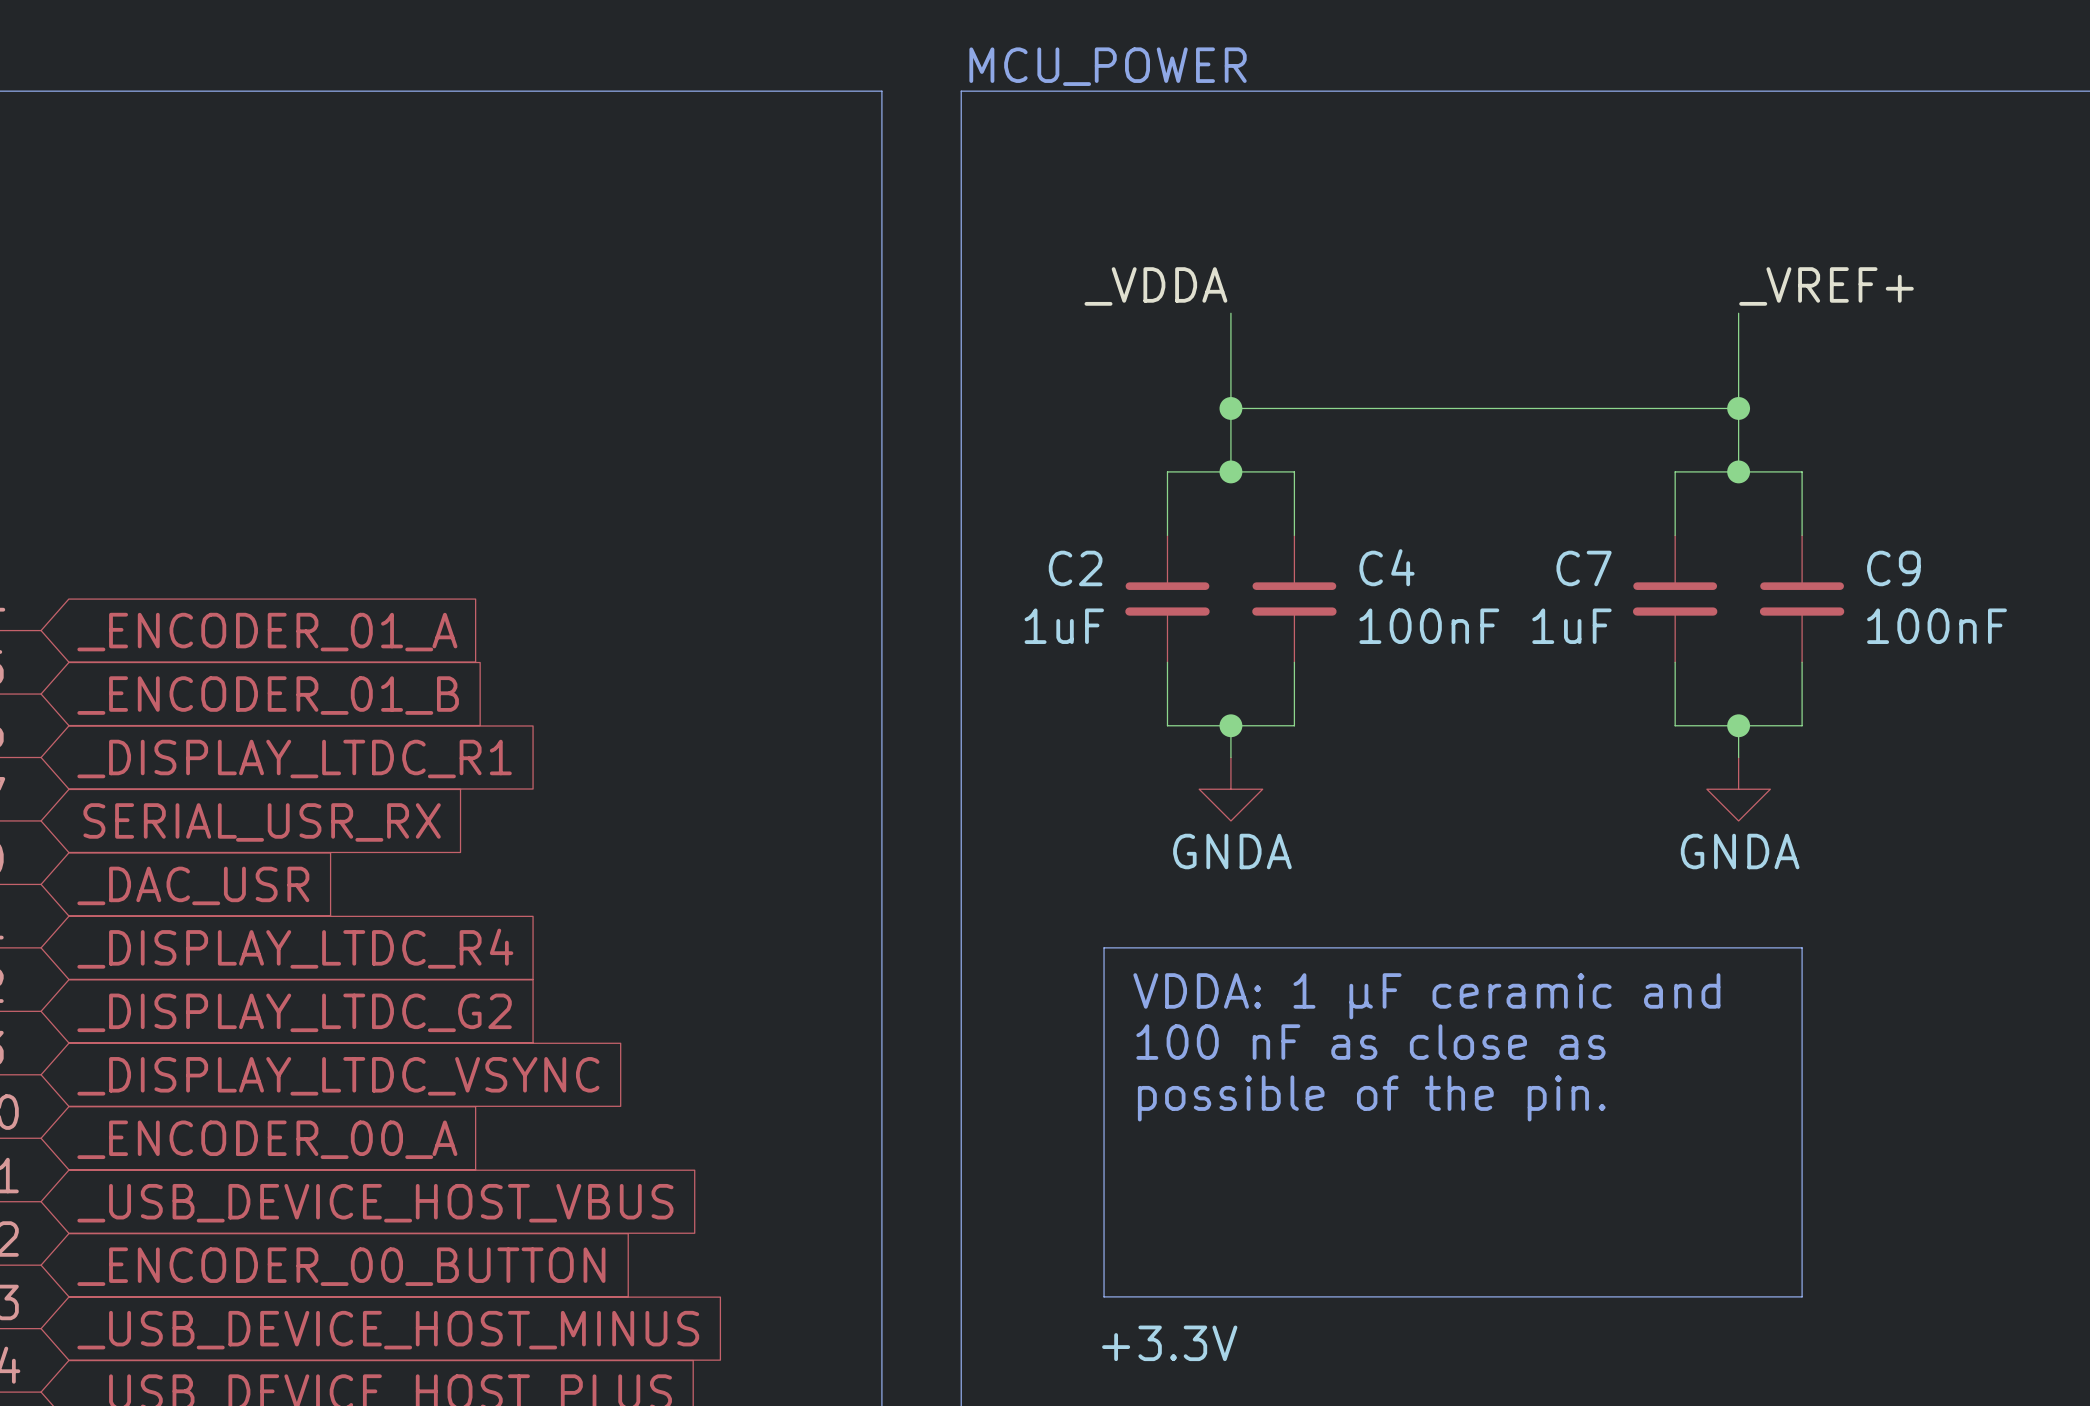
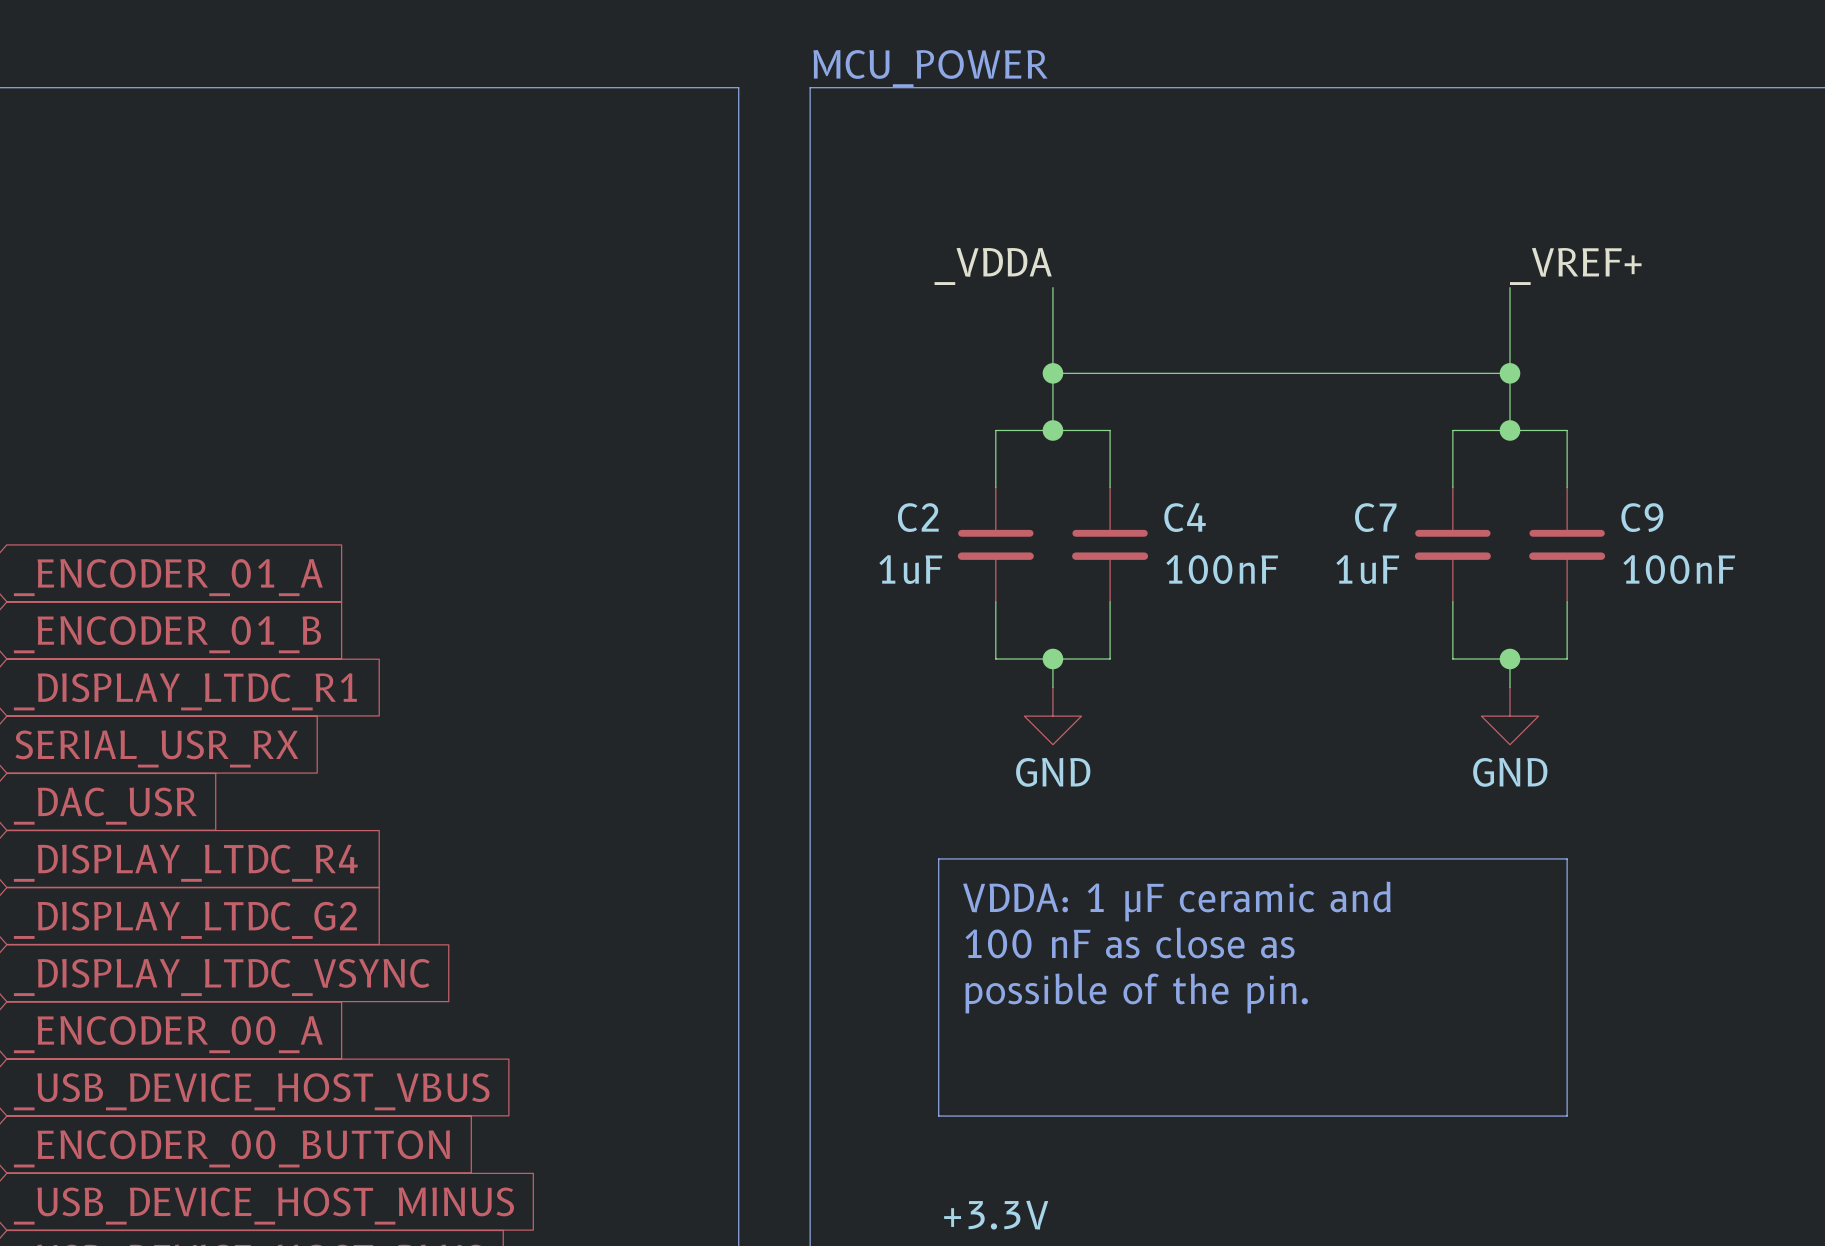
power symbol: GNDA (1230, 789) -> GND (1052, 716)
power symbol: GNDA (1738, 789) -> GND (1510, 716)
line: (1104, 1233) (1104, 1296) (1802, 1296) (1802, 1233) -> (938, 1116) (1567, 1116)

